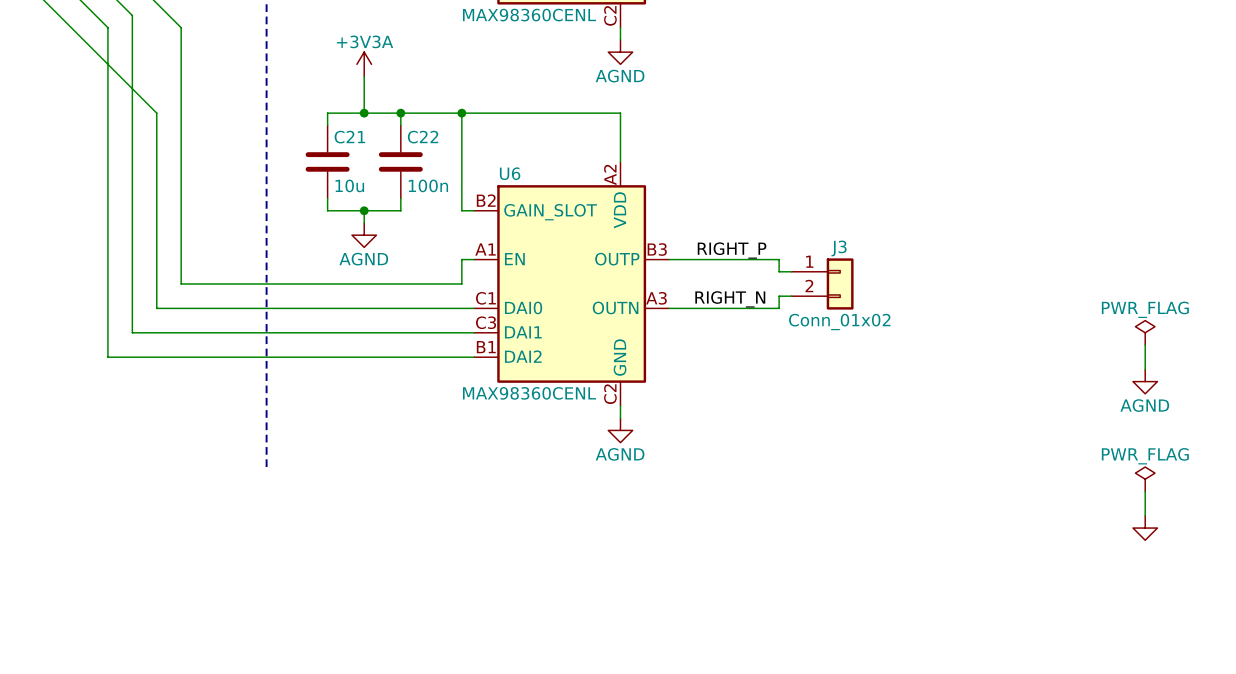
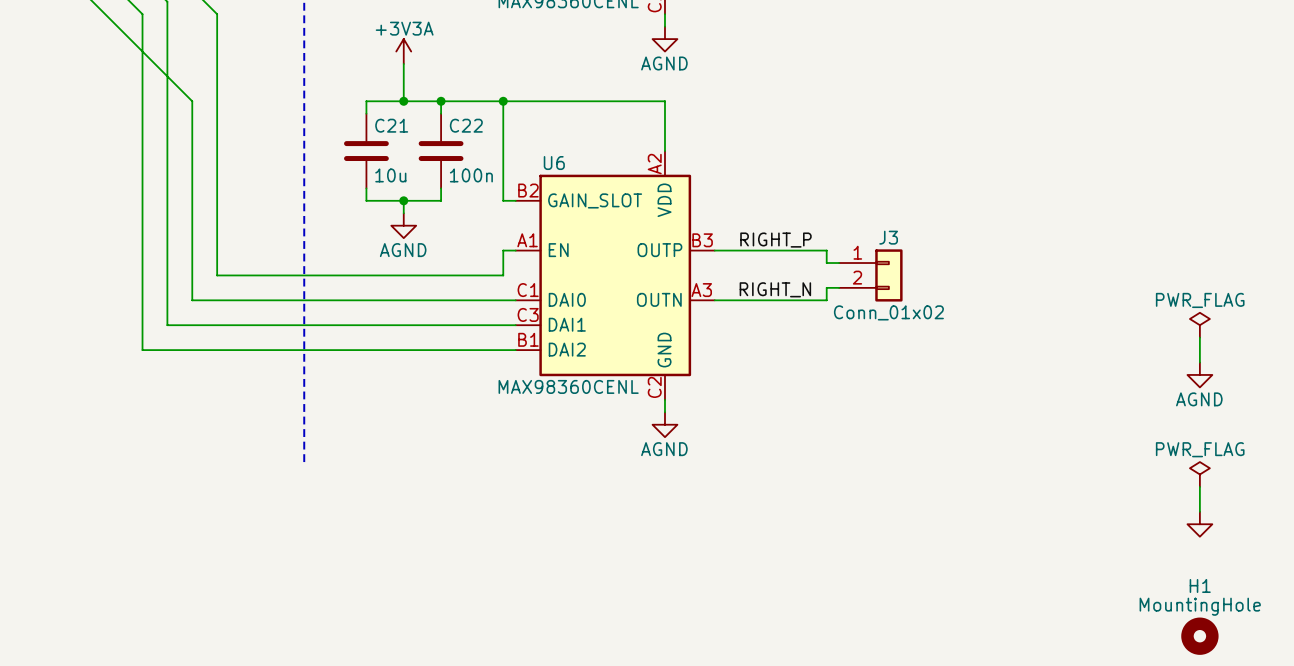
H1: none -> MountingHole (1199, 636)

